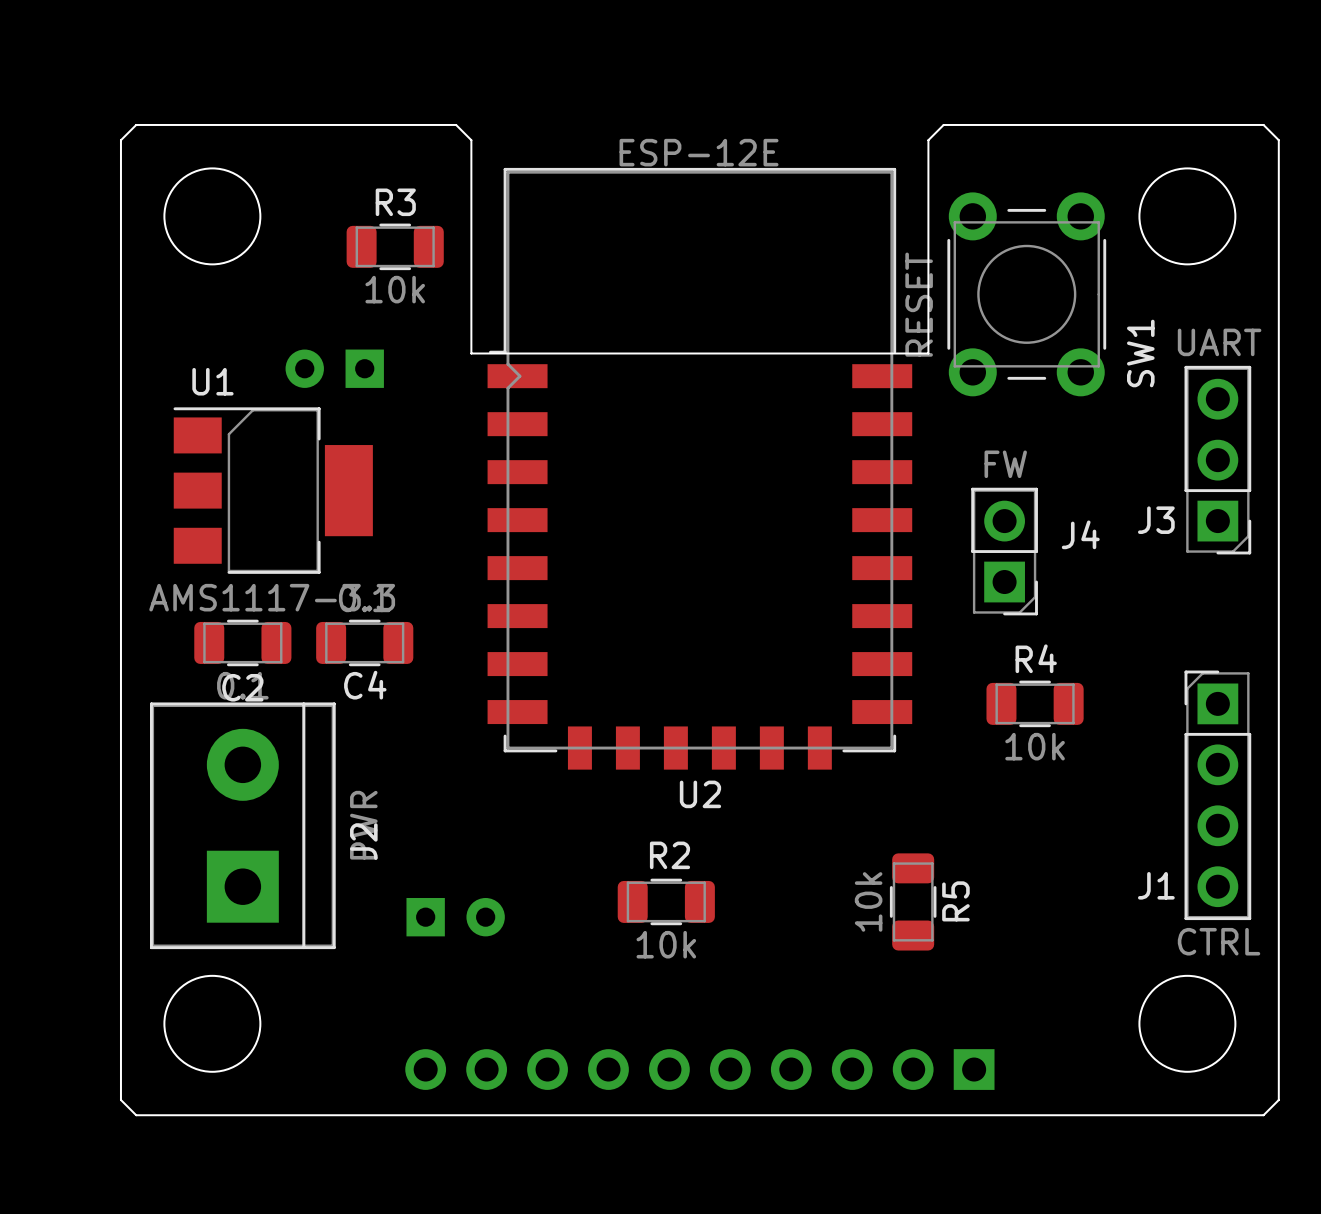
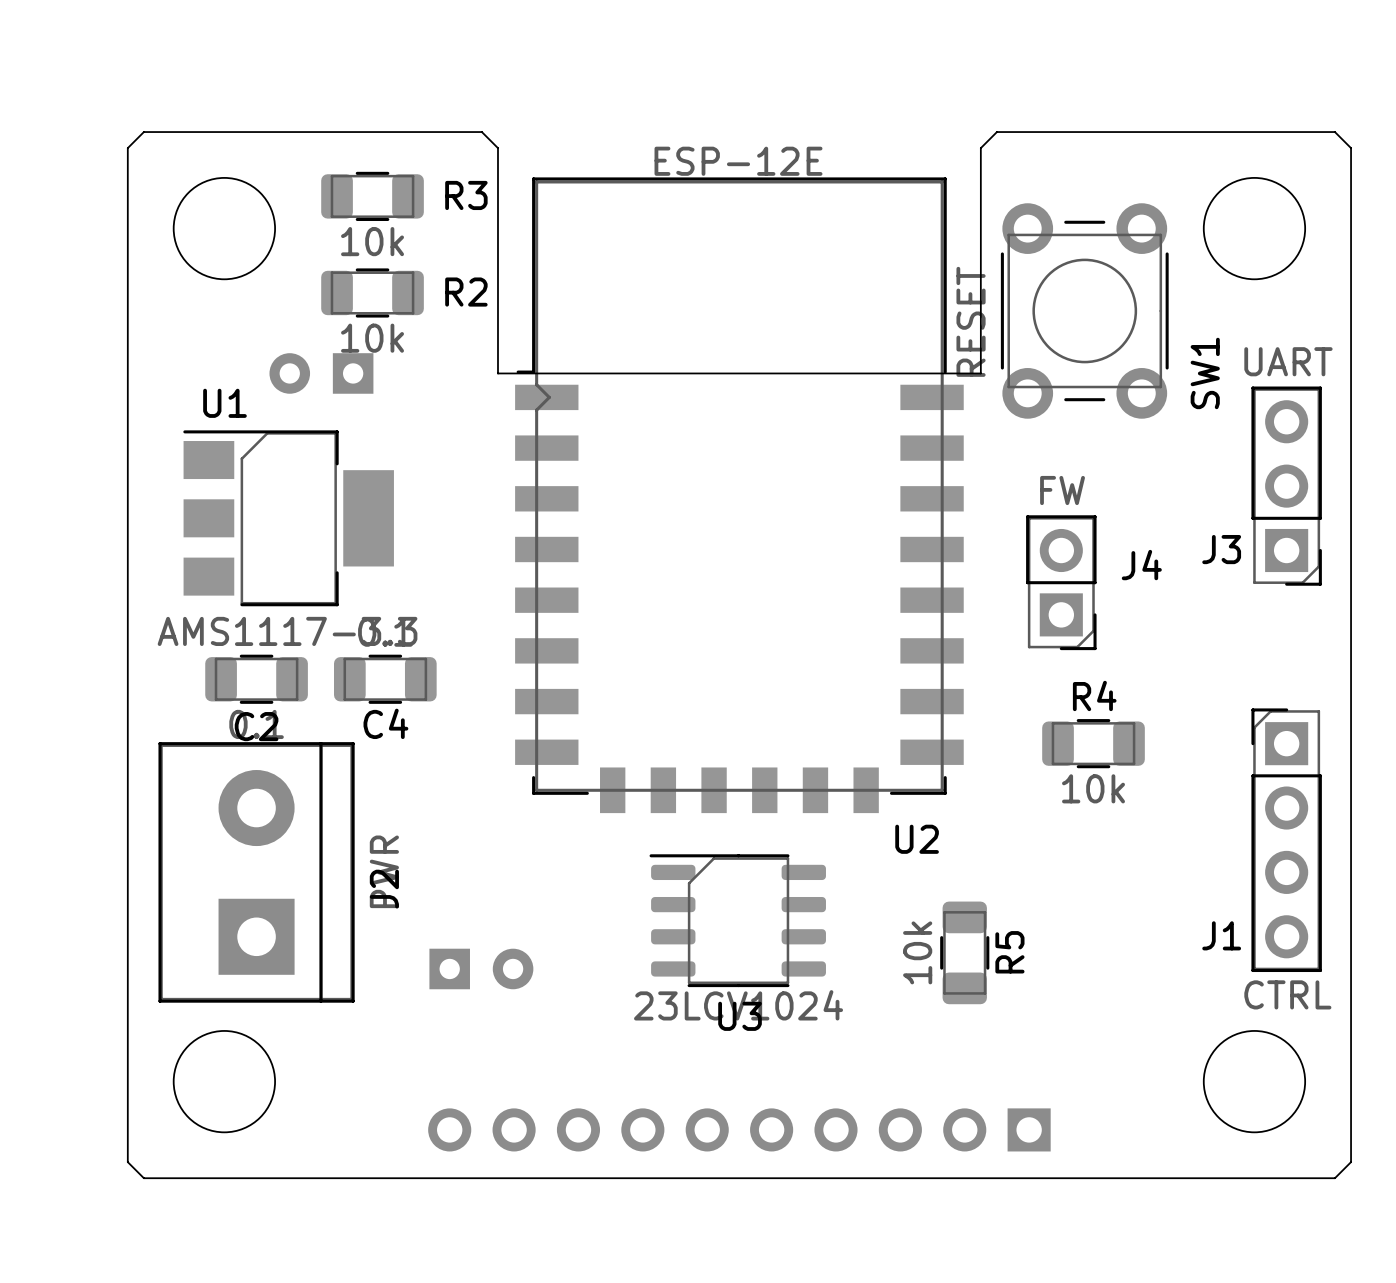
R3 name position: R3 (395, 202) -> R3 (466, 195)
R3 position: (395, 246) -> (372, 196)
part position: (334, 368) -> (321, 373)
U2 name position: U2 (700, 794) -> U2 (917, 839)
R2 name position: R2 (669, 855) -> R2 (466, 292)
U3: none -> 23LCV1024 (737, 920)
R2 position: (666, 901) -> (372, 292)

